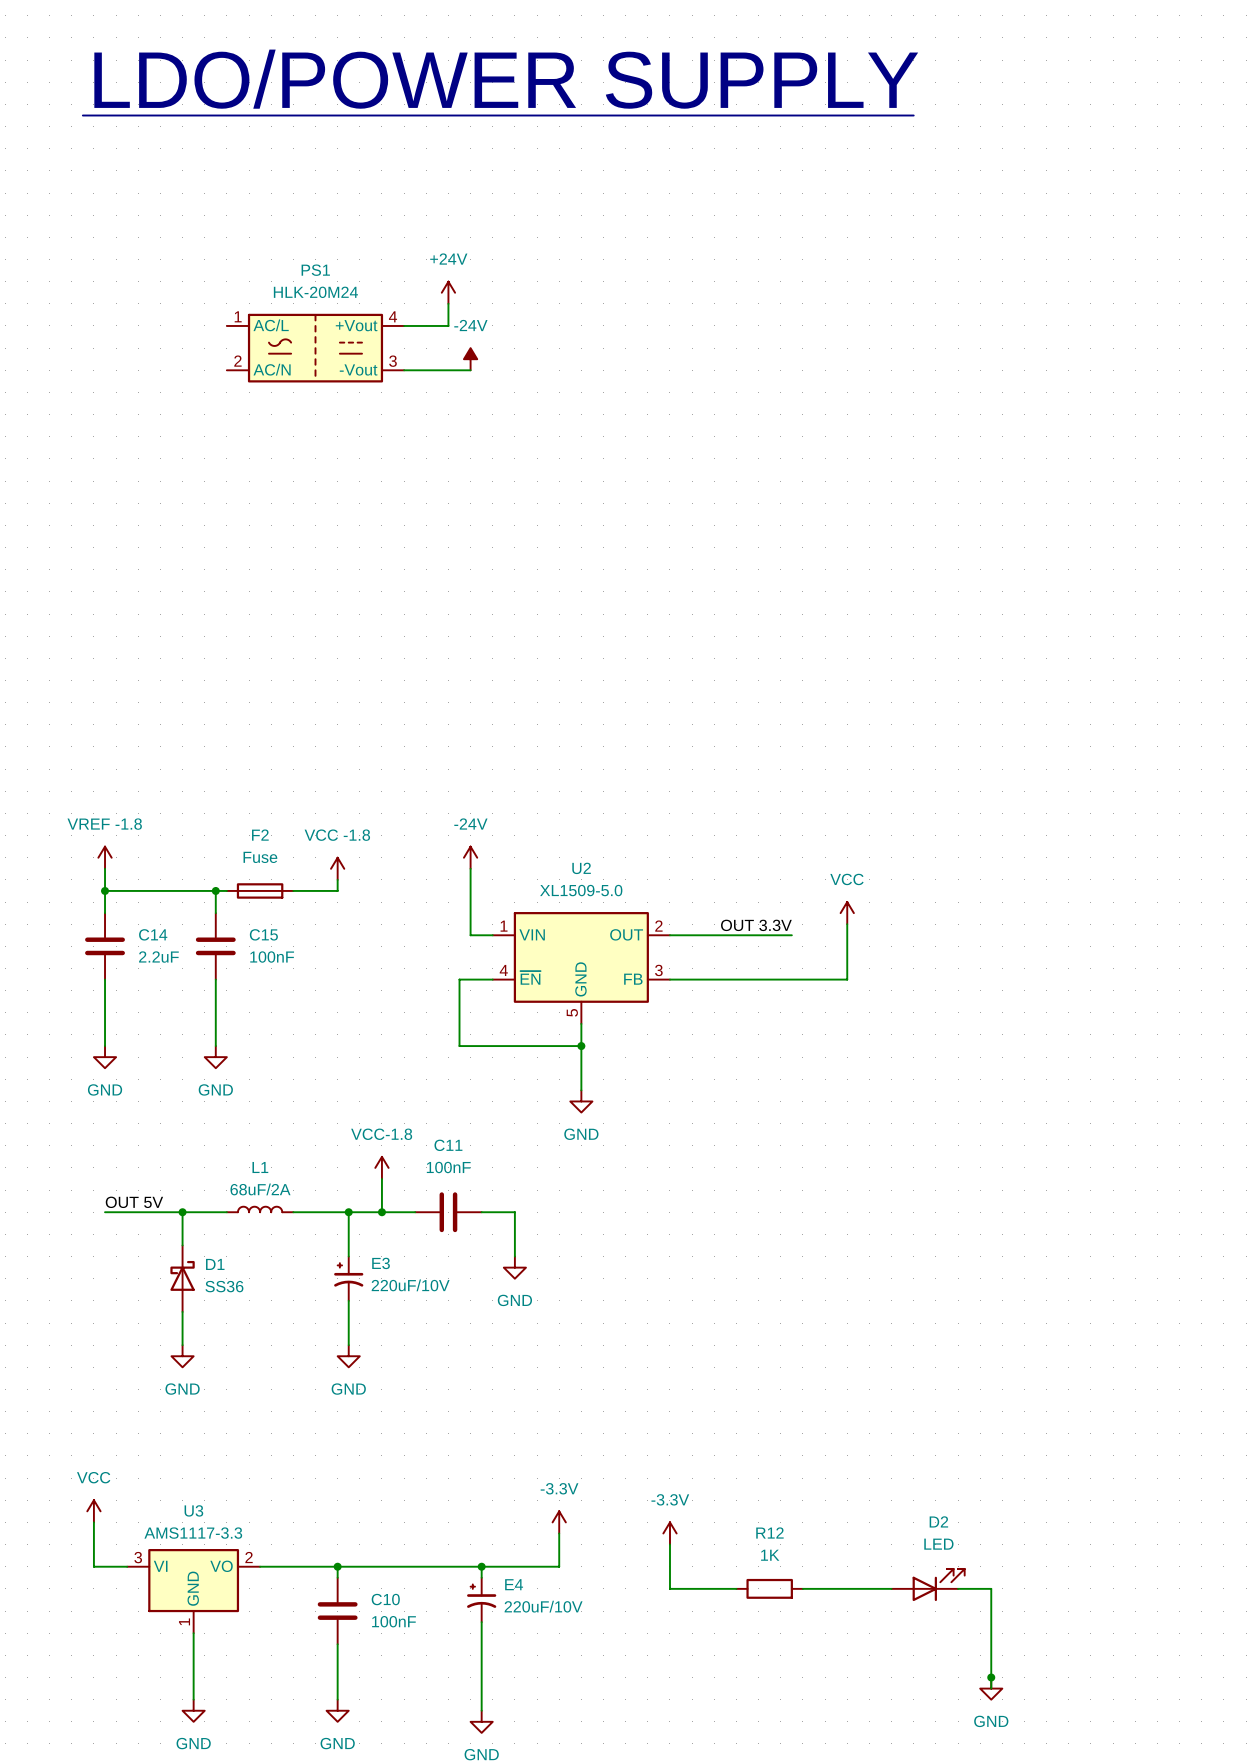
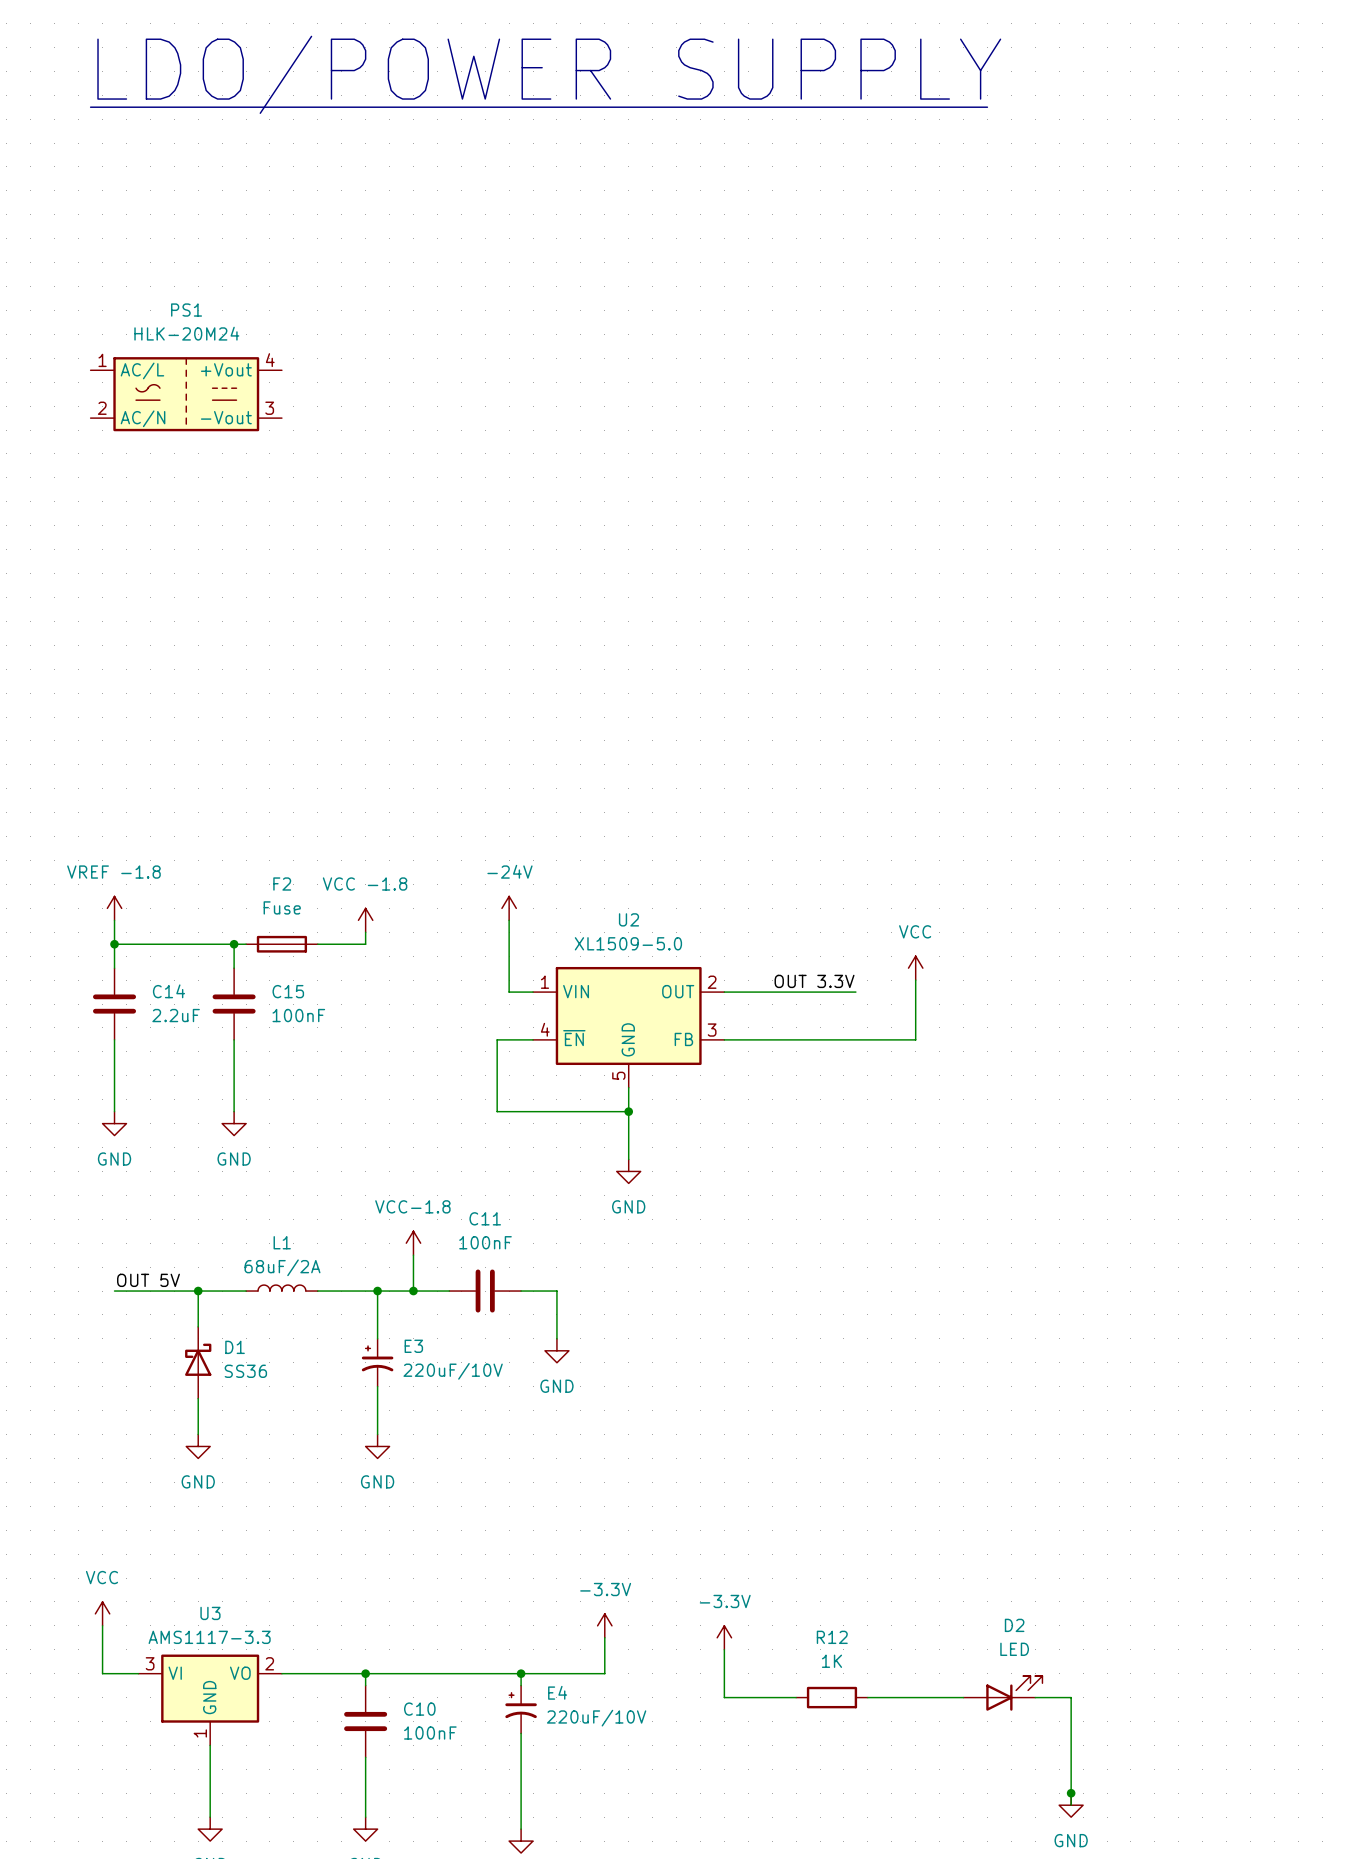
power symbol: +24V (448, 292) -> none
wire: (448, 303) (448, 325) (404, 325) -> none
PS1 position: (315, 348) -> (186, 394)
power symbol: -24V (470, 359) -> none
wire: (404, 370) (470, 370) -> none

